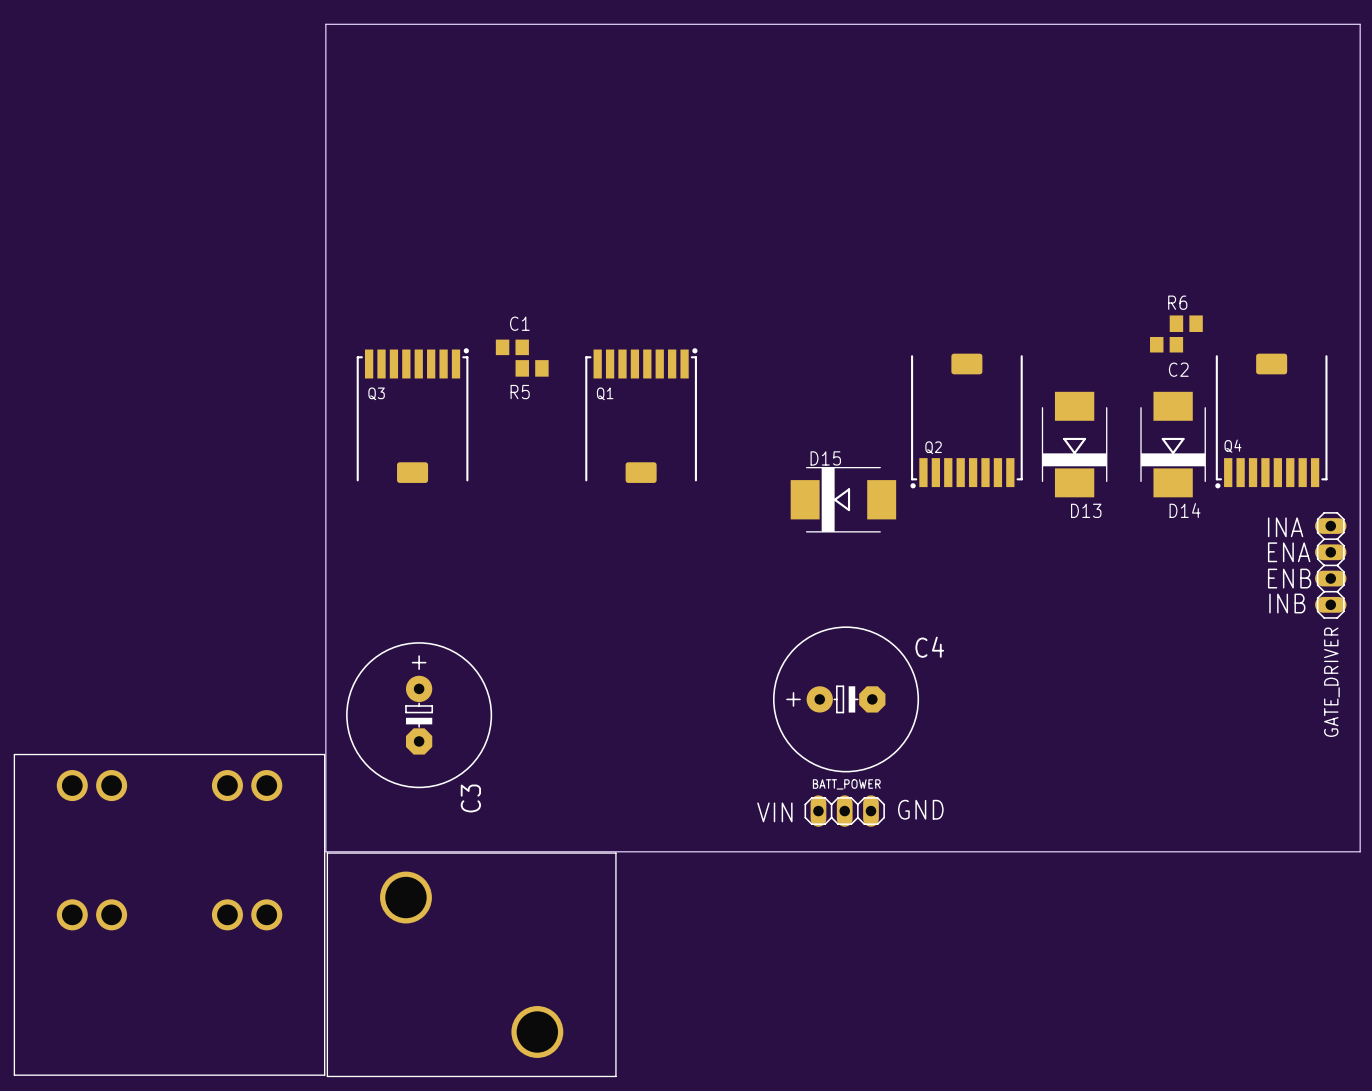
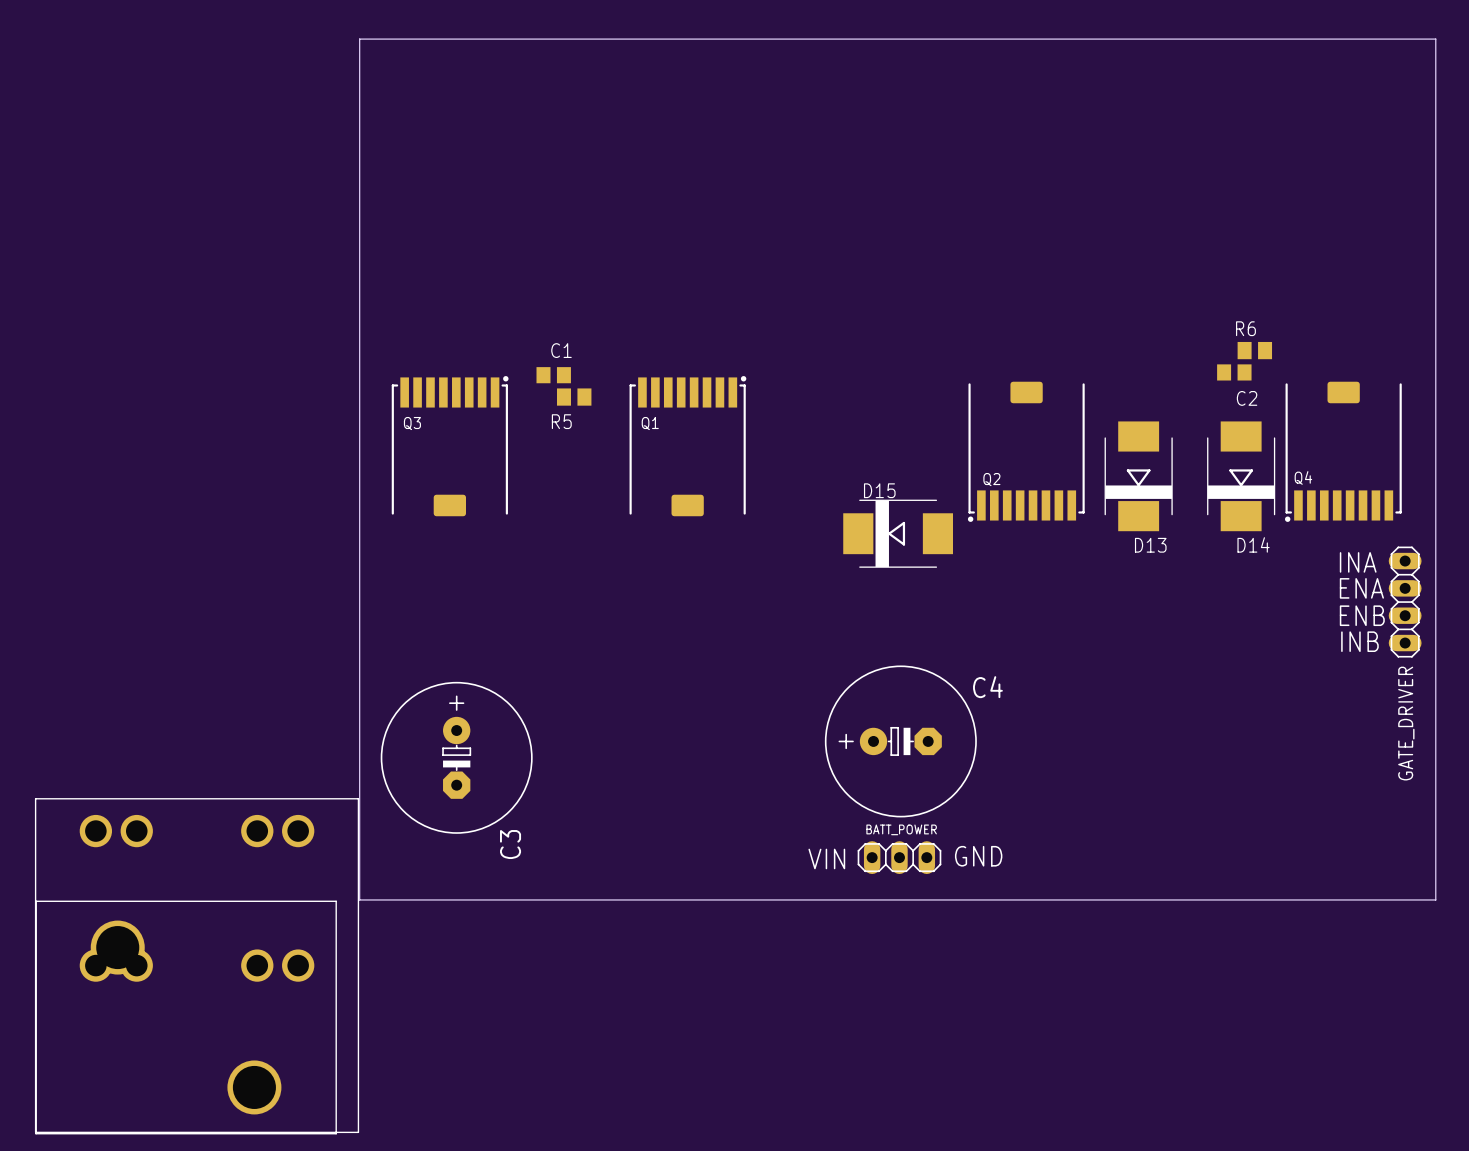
part: none -> (186, 1017)
part: (471, 964) -> none

